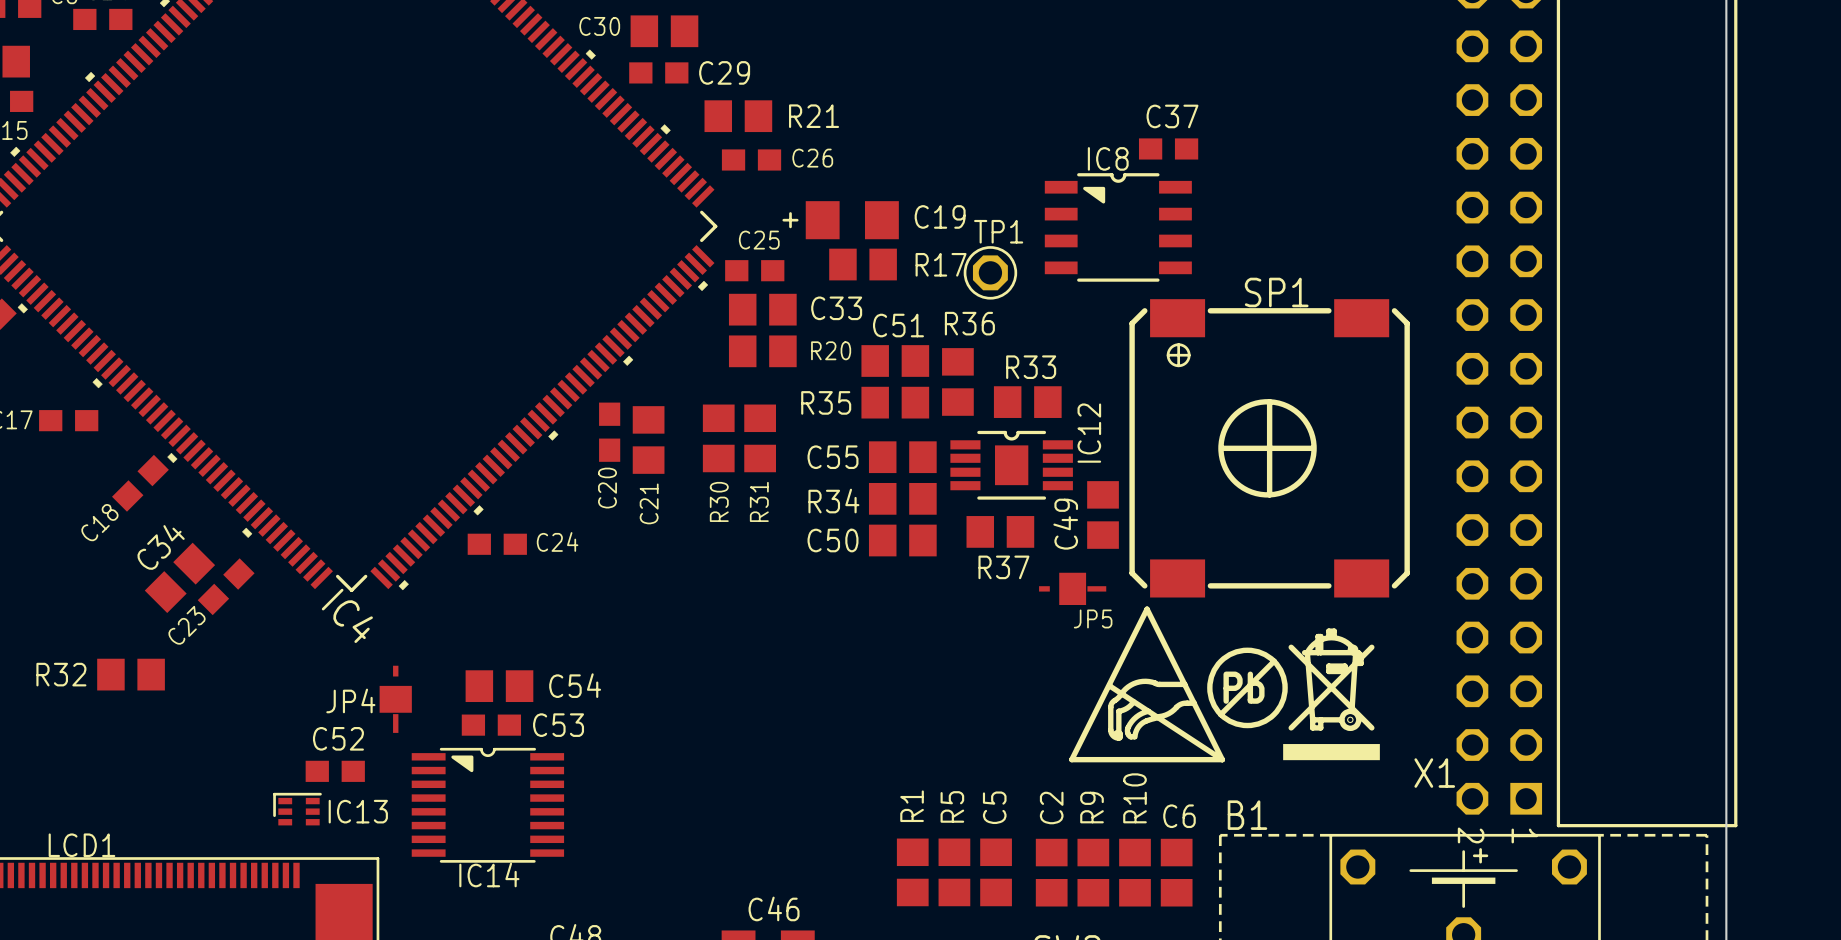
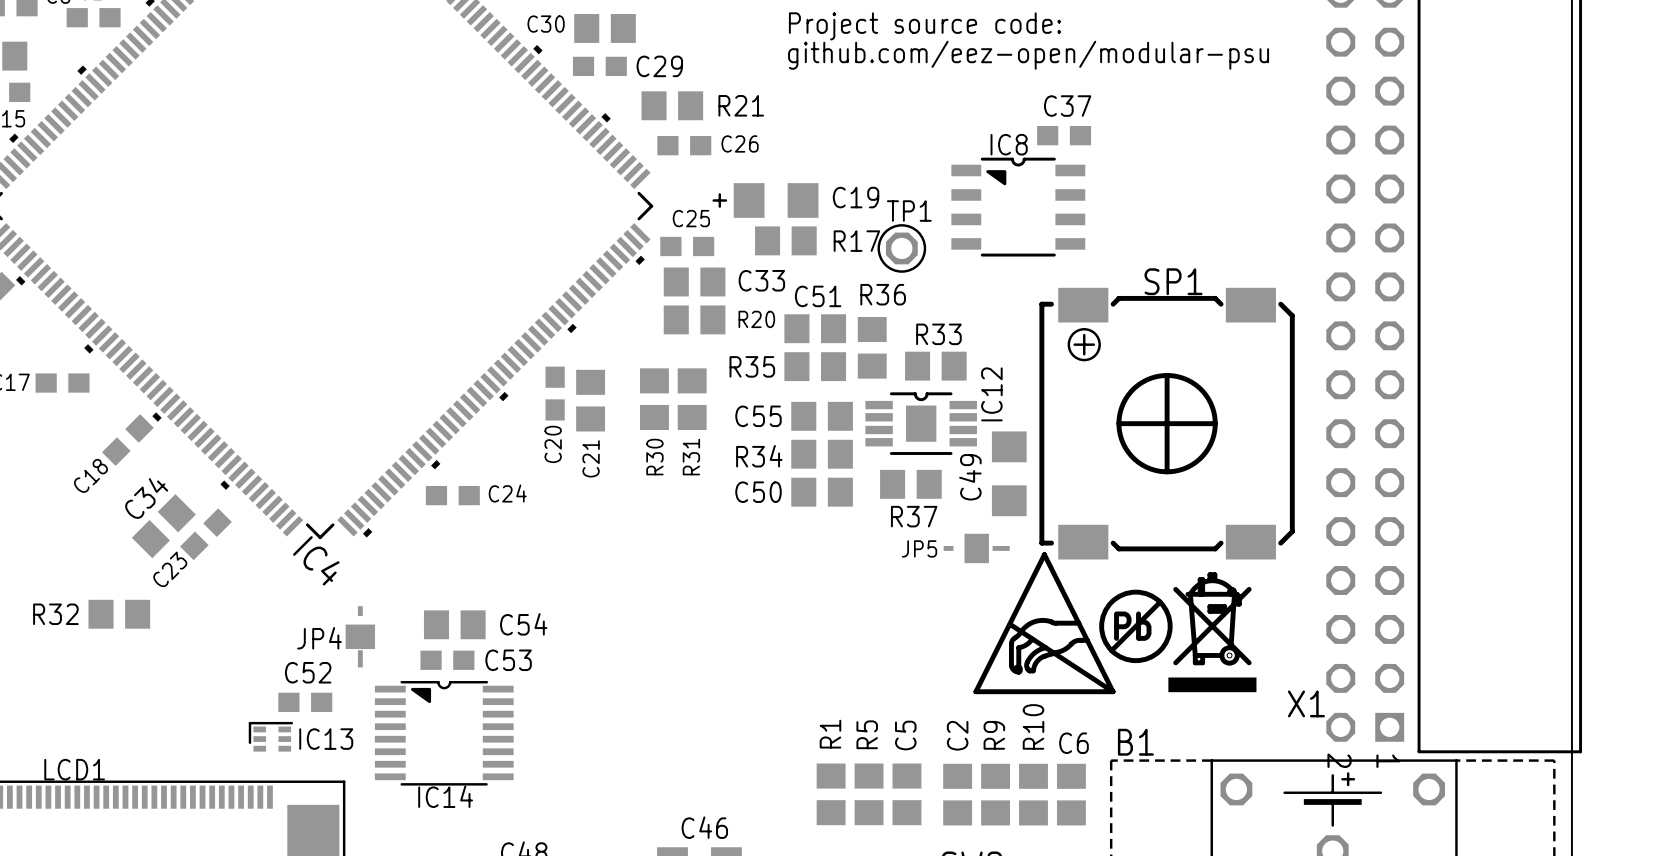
text: none -> Project source code: (924, 26)
text: none -> github.com/eez-open/modular-psu (1028, 55)
SP1 footprint: [1129, 299, 1410, 598] -> [1039, 287, 1295, 560]
C49 footprint: [1087, 481, 1119, 549] -> [991, 431, 1027, 517]
JP5 footprint: [1039, 572, 1107, 606] -> [943, 533, 1010, 564]
JP5 name position: JP5 (1093, 618) -> JP5 (919, 548)

